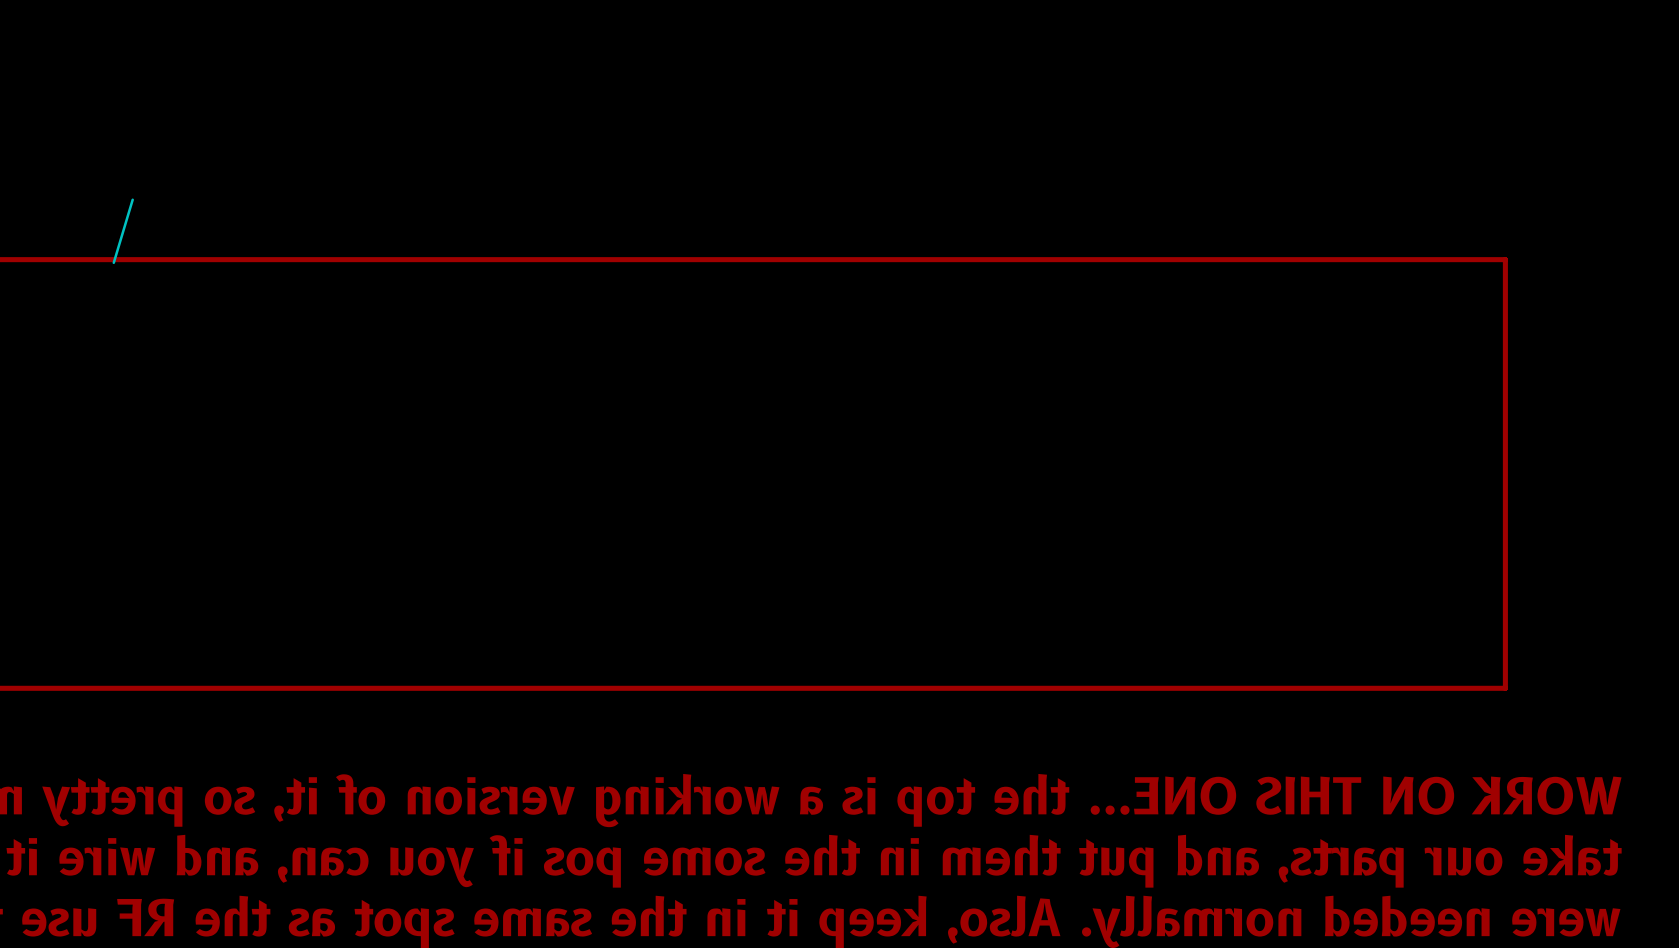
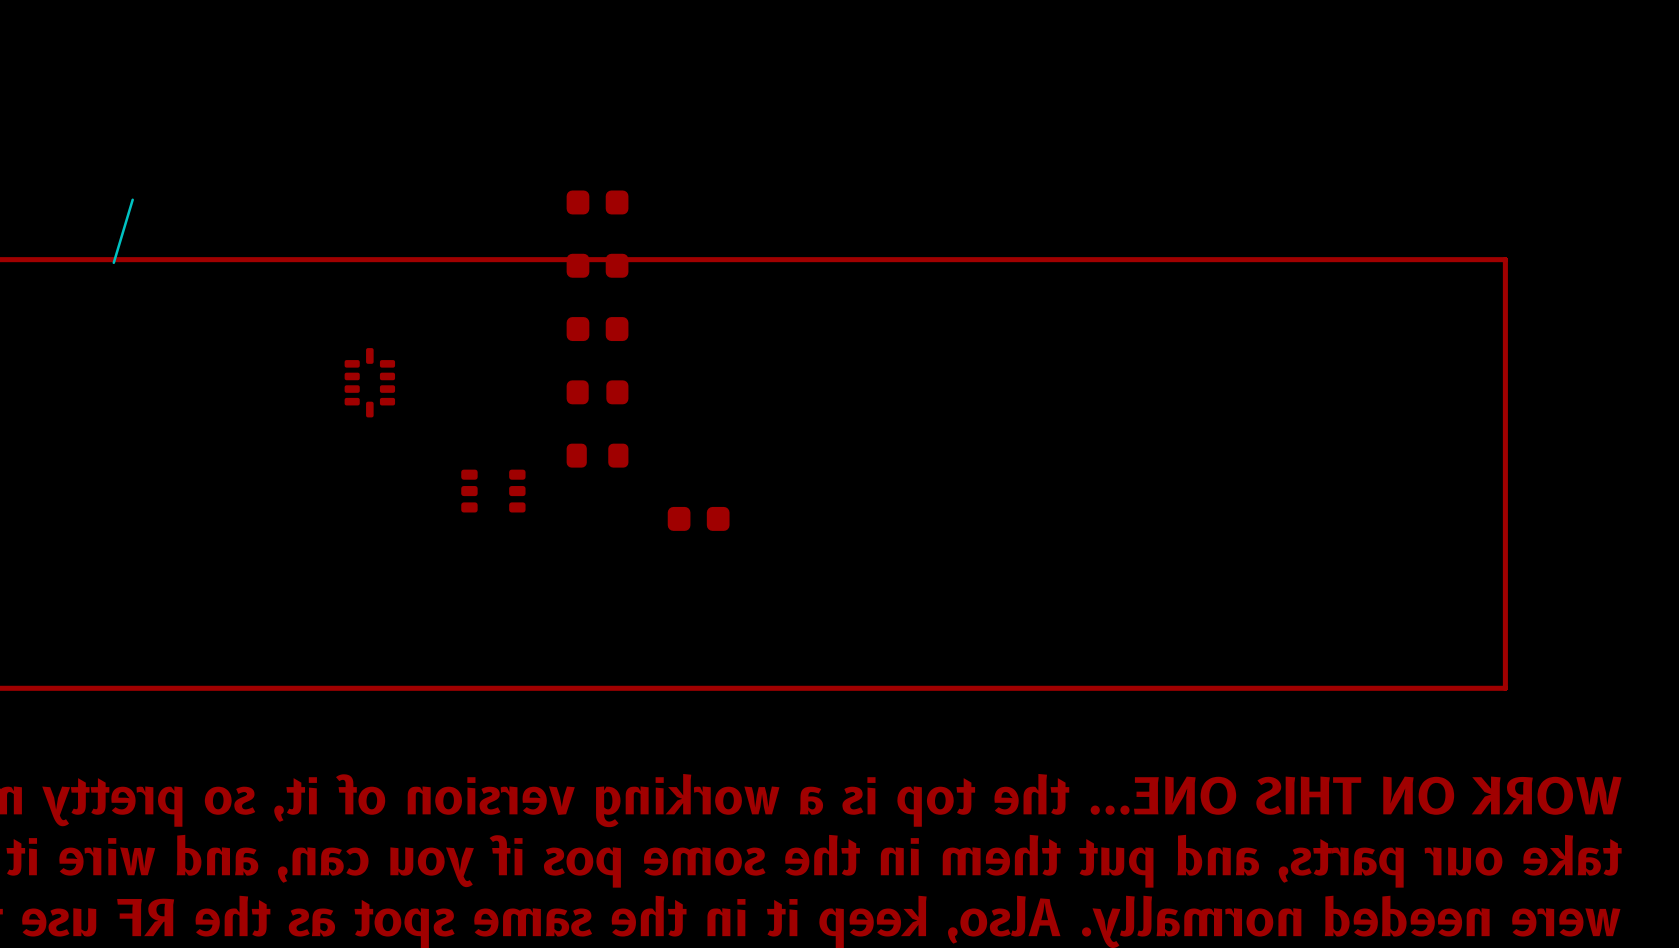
part: none -> (597, 202)
part: none -> (597, 265)
part: none -> (597, 329)
part: none -> (369, 382)
part: none -> (597, 392)
part: none -> (597, 455)
part: none -> (493, 491)
part: none -> (698, 518)

